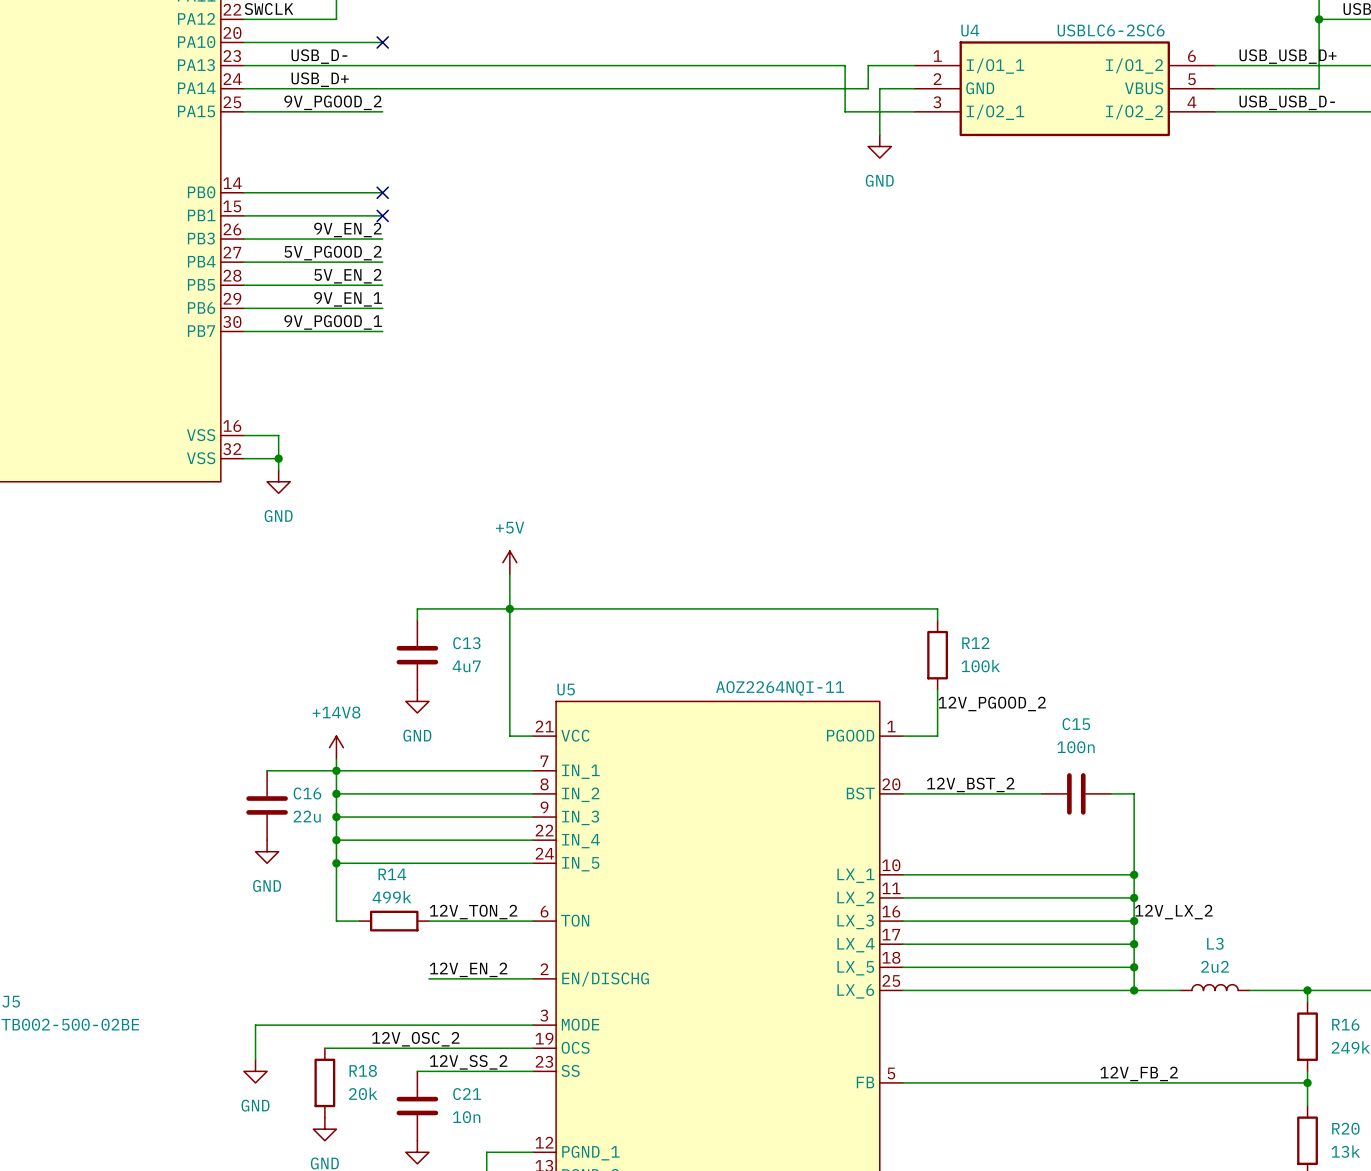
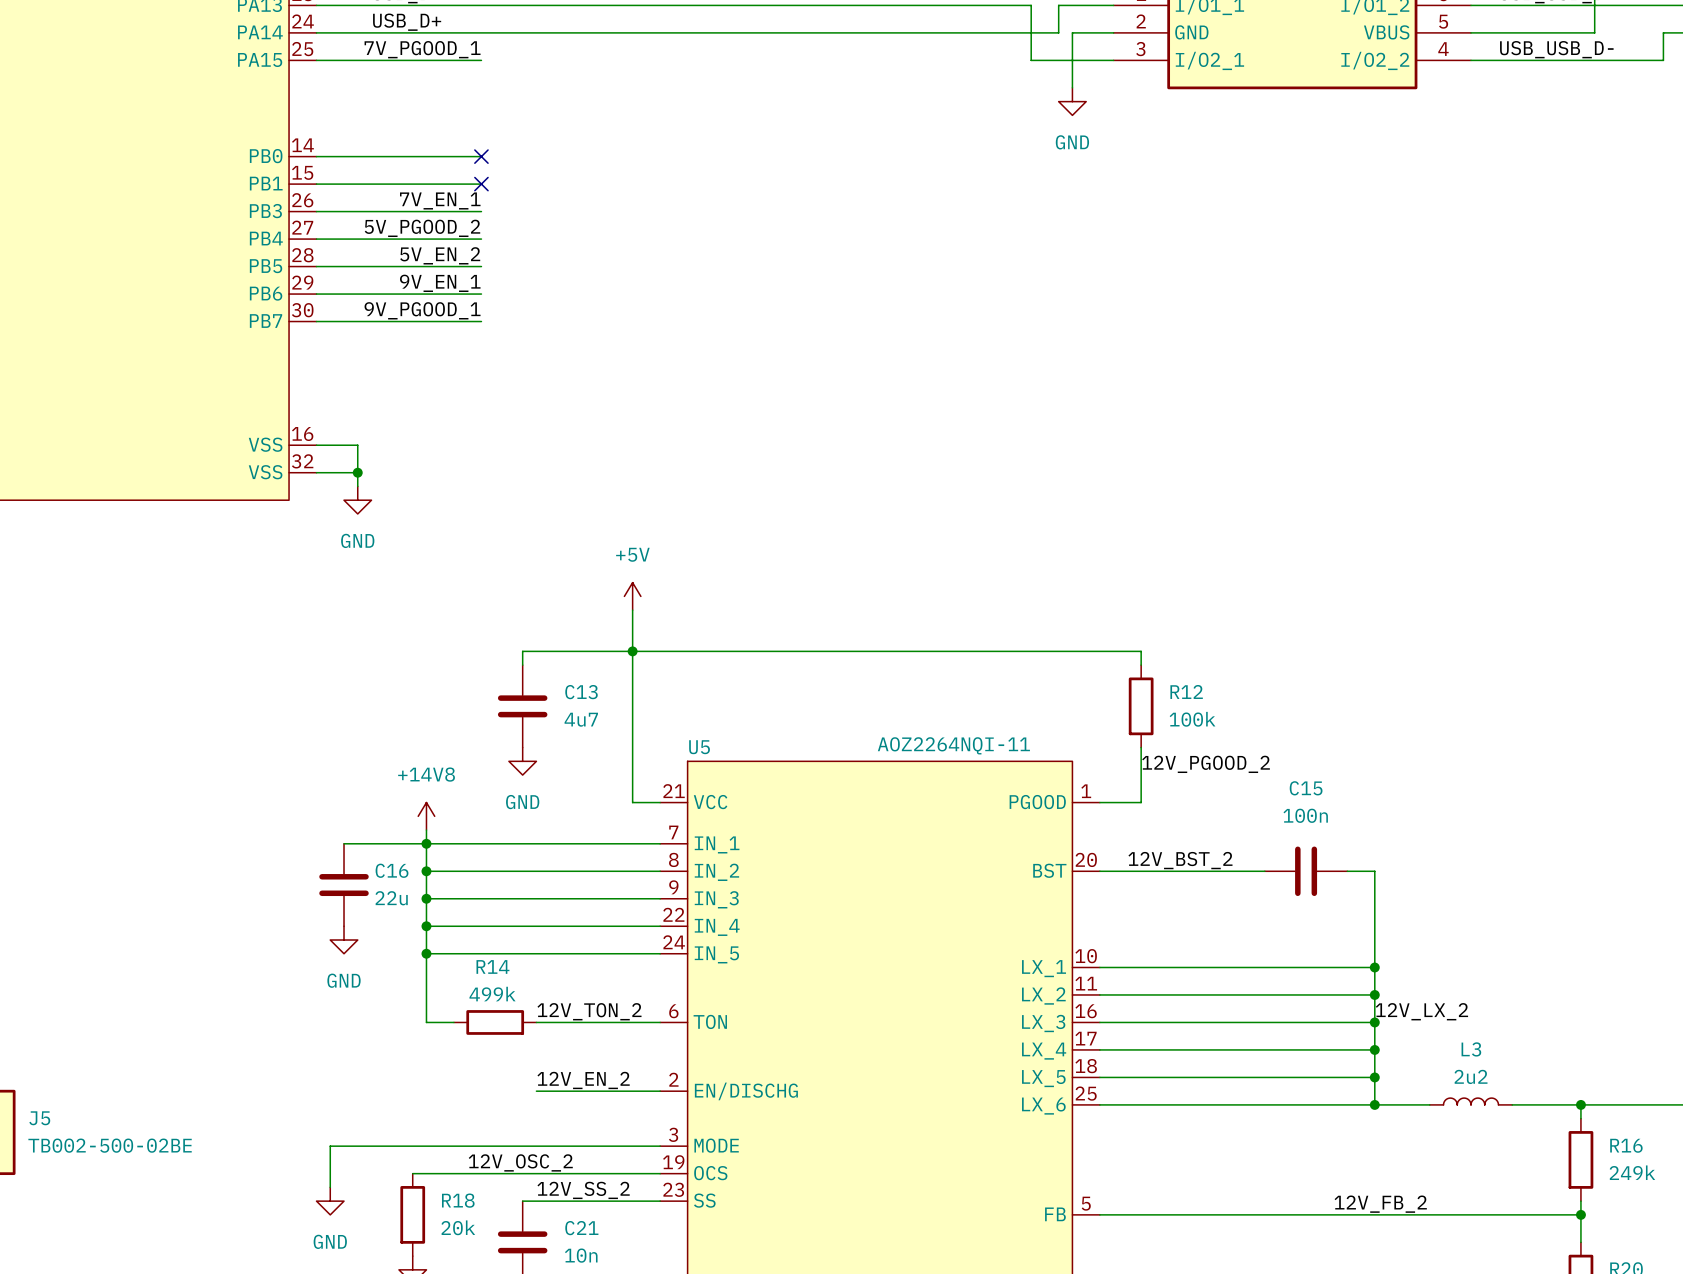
label: 9V_PGOOD_2 (333, 102) -> 7V_PGOOD_1 (422, 49)
label: 9V_EN_2 (347, 229) -> 7V_EN_1 (440, 200)

